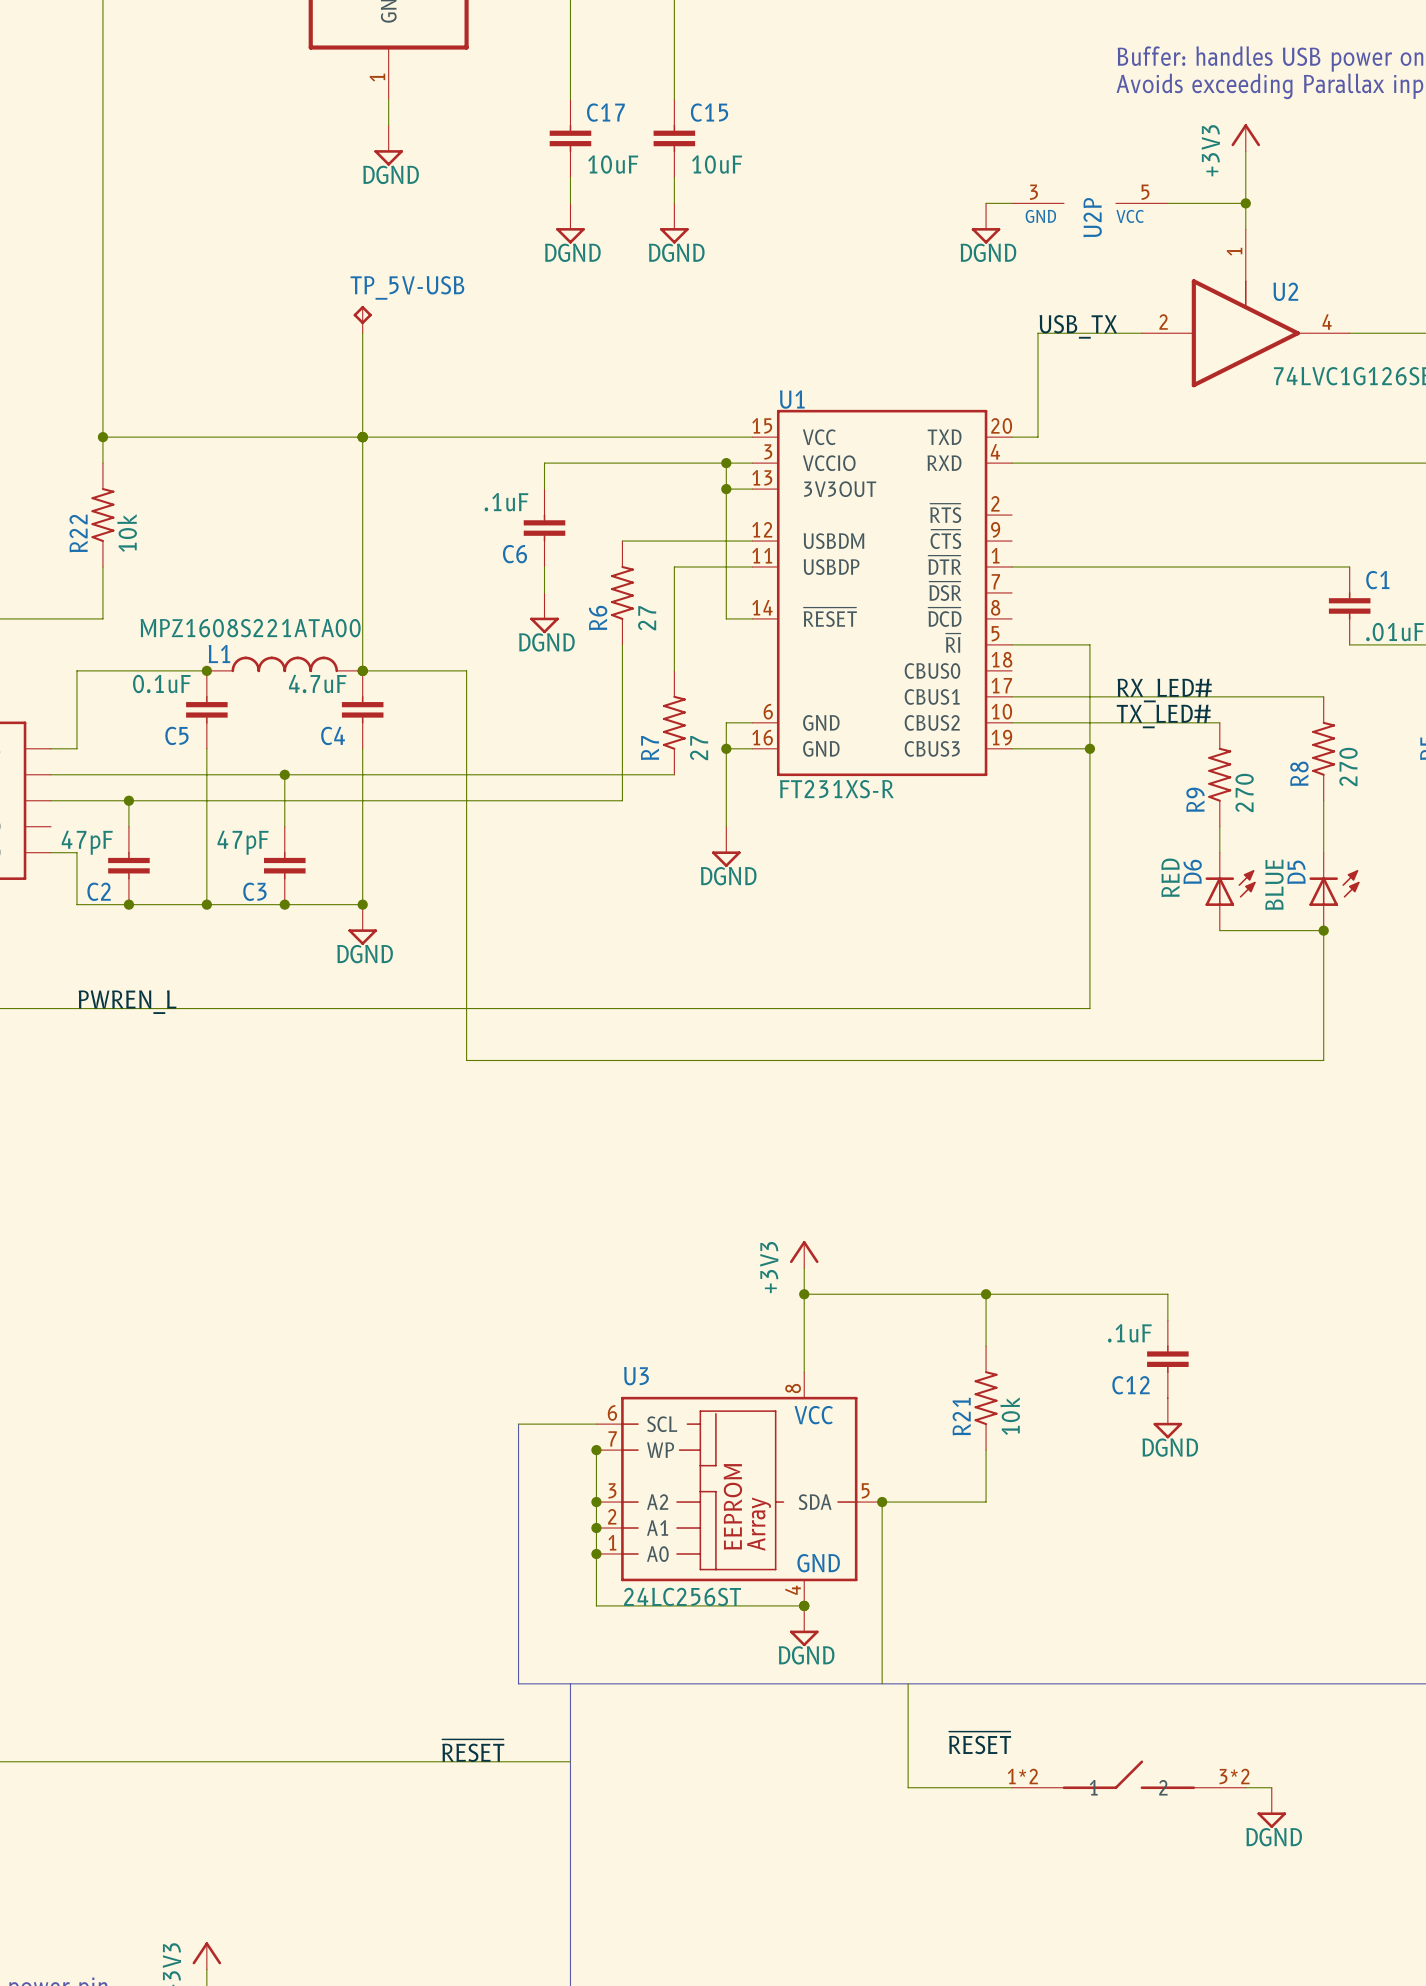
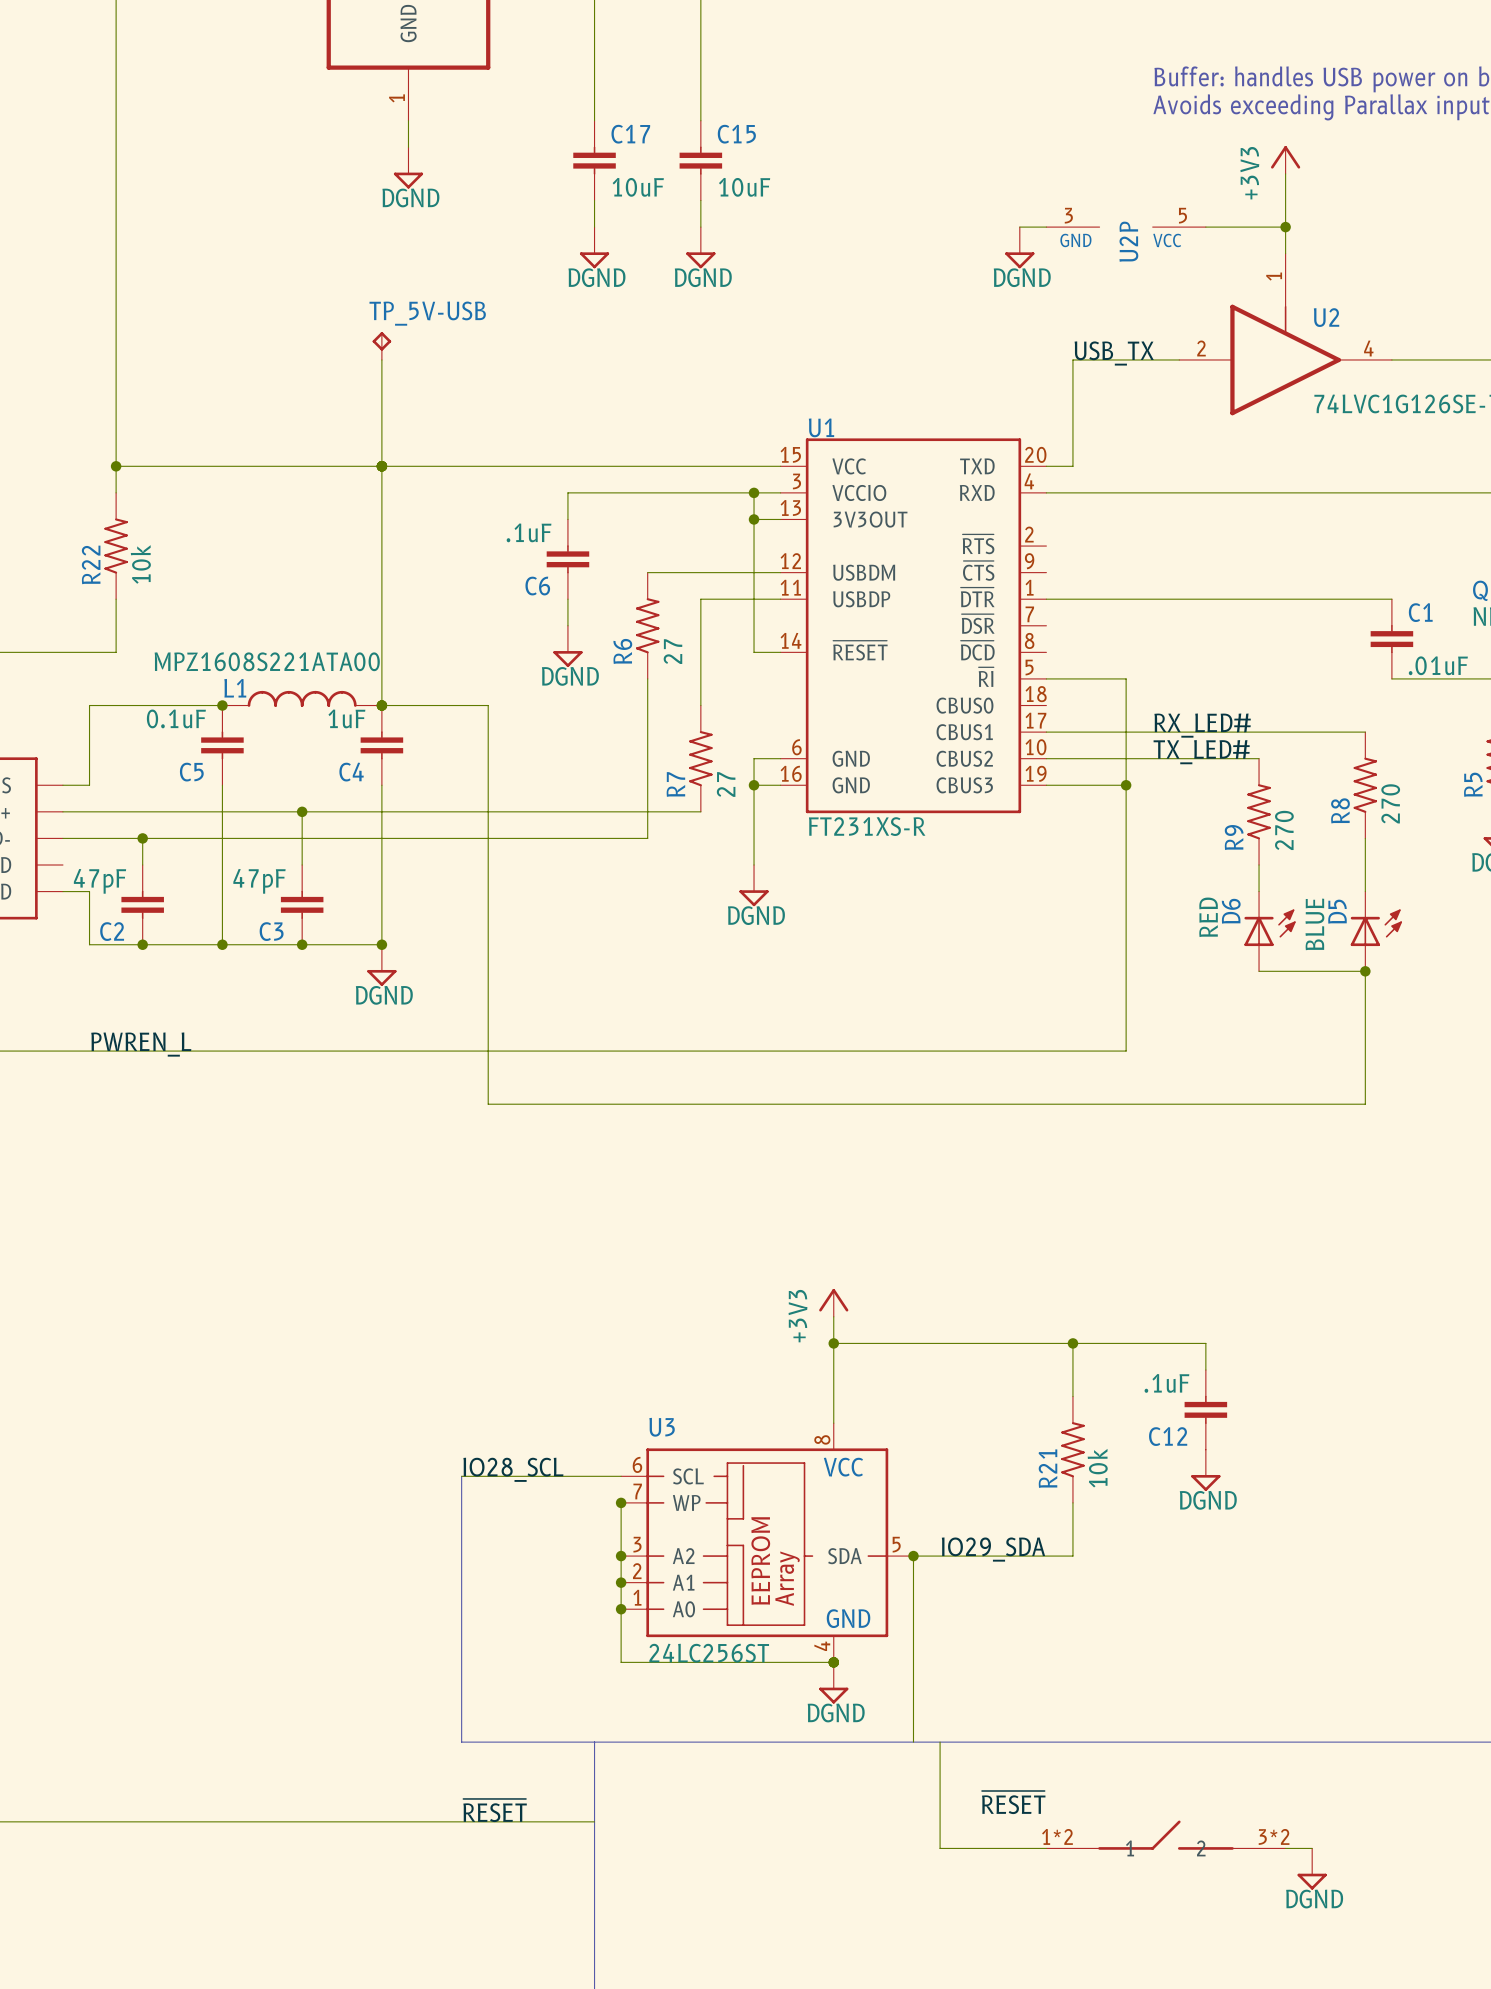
C4 value: 4.7uF (317, 683) -> 1uF (346, 718)
wire: (986, 1294) (986, 1346) -> (1072, 1343) (1072, 1396)
junction position: (986, 1294) -> (1072, 1343)
R21 position: (986, 1398) -> (1072, 1449)
label: none -> IO28_SCL (513, 1469)
wire: none -> (461, 1476) (541, 1476)
bus: (518, 1424) (518, 1683) -> (461, 1476) (461, 1742) (541, 1742)
wire: (986, 1450) (986, 1502) -> (1072, 1502) (1072, 1556) (1019, 1556)
label: none -> IO29_SDA (993, 1549)

